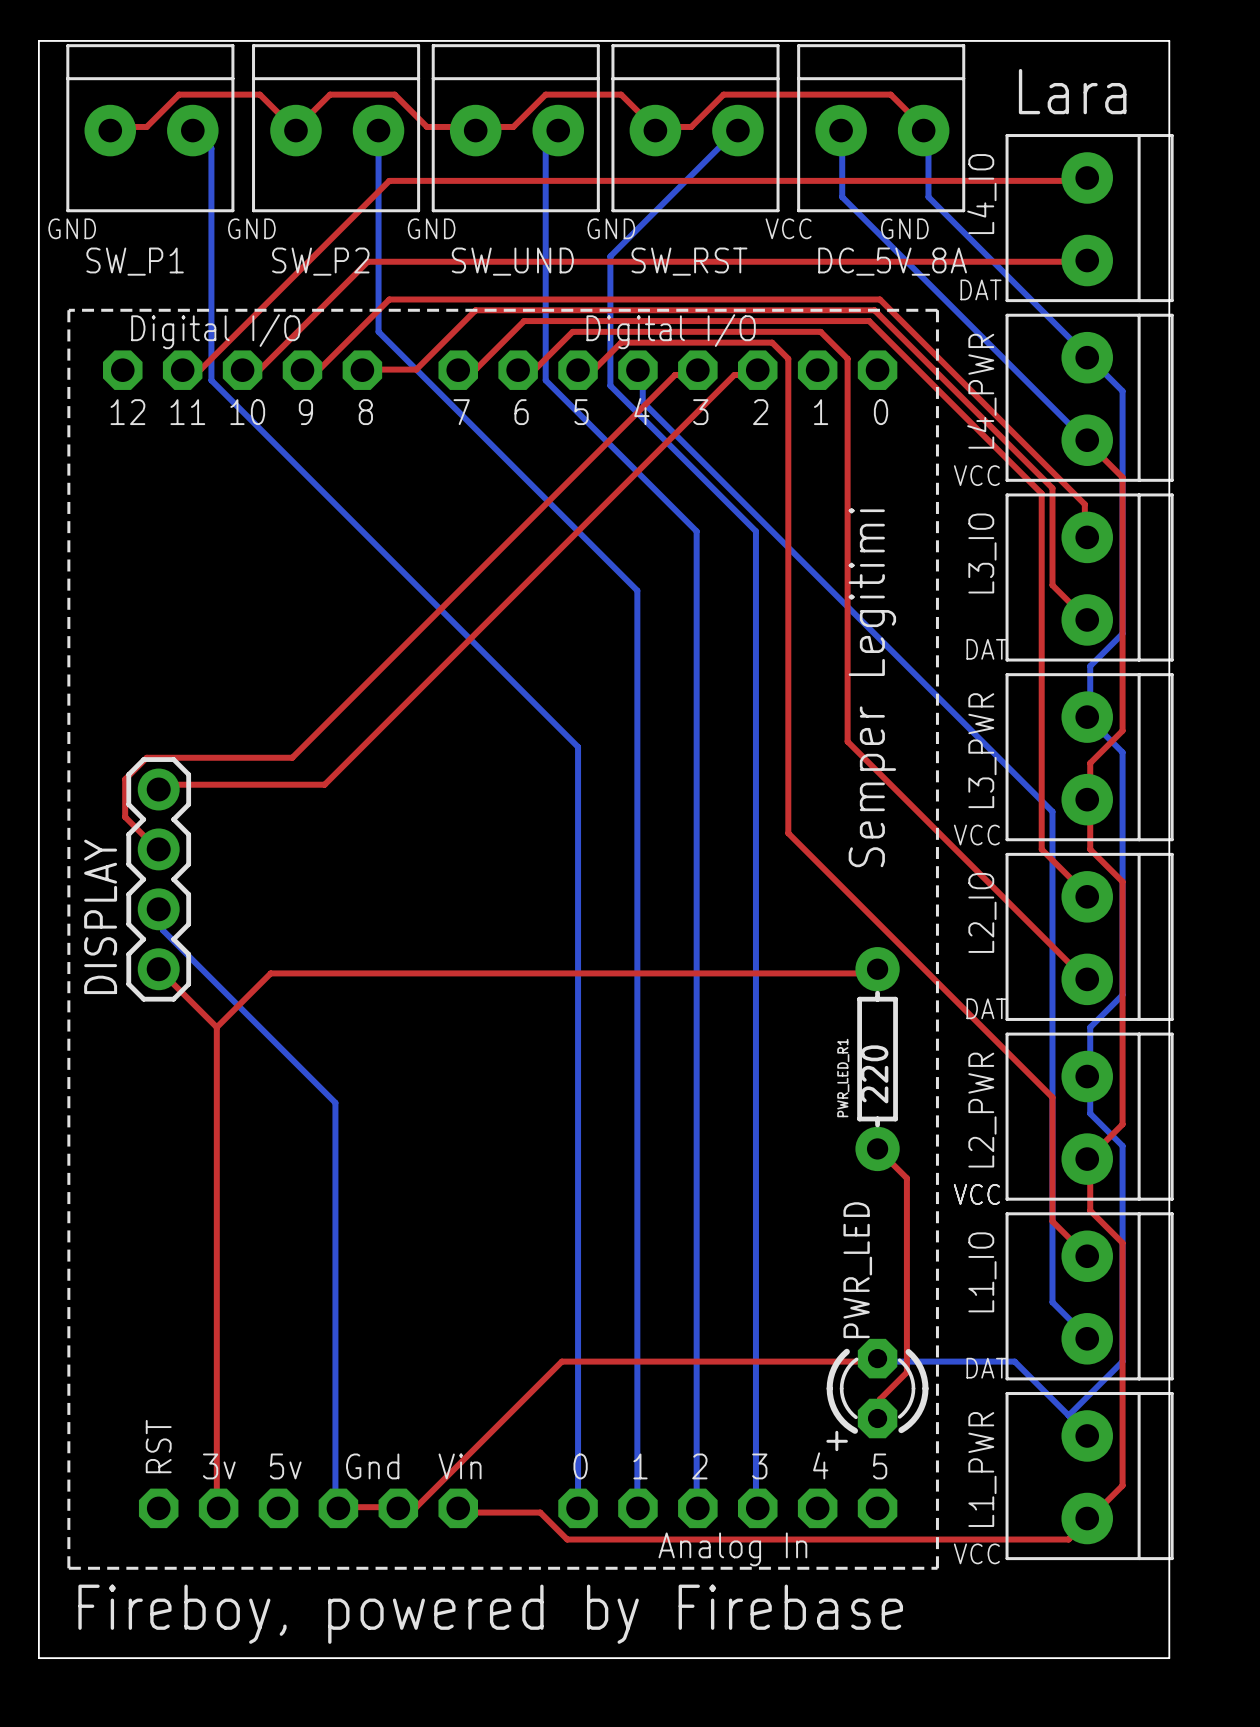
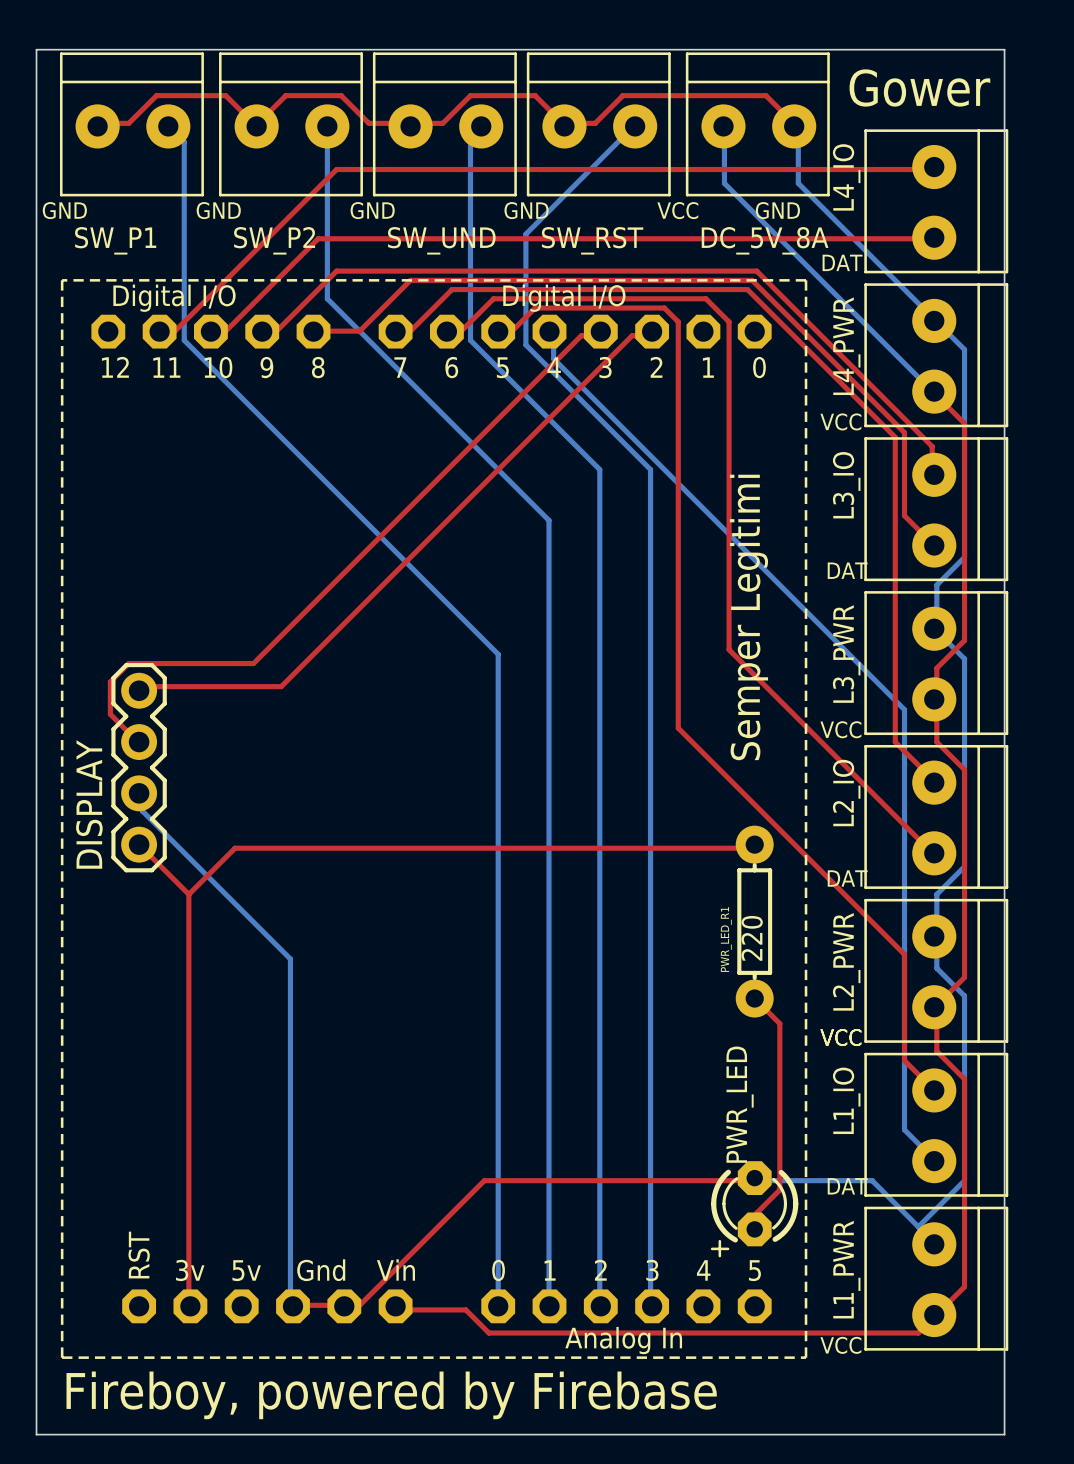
text: none -> Gower (919, 87)
text: Lara (1072, 91) -> none

